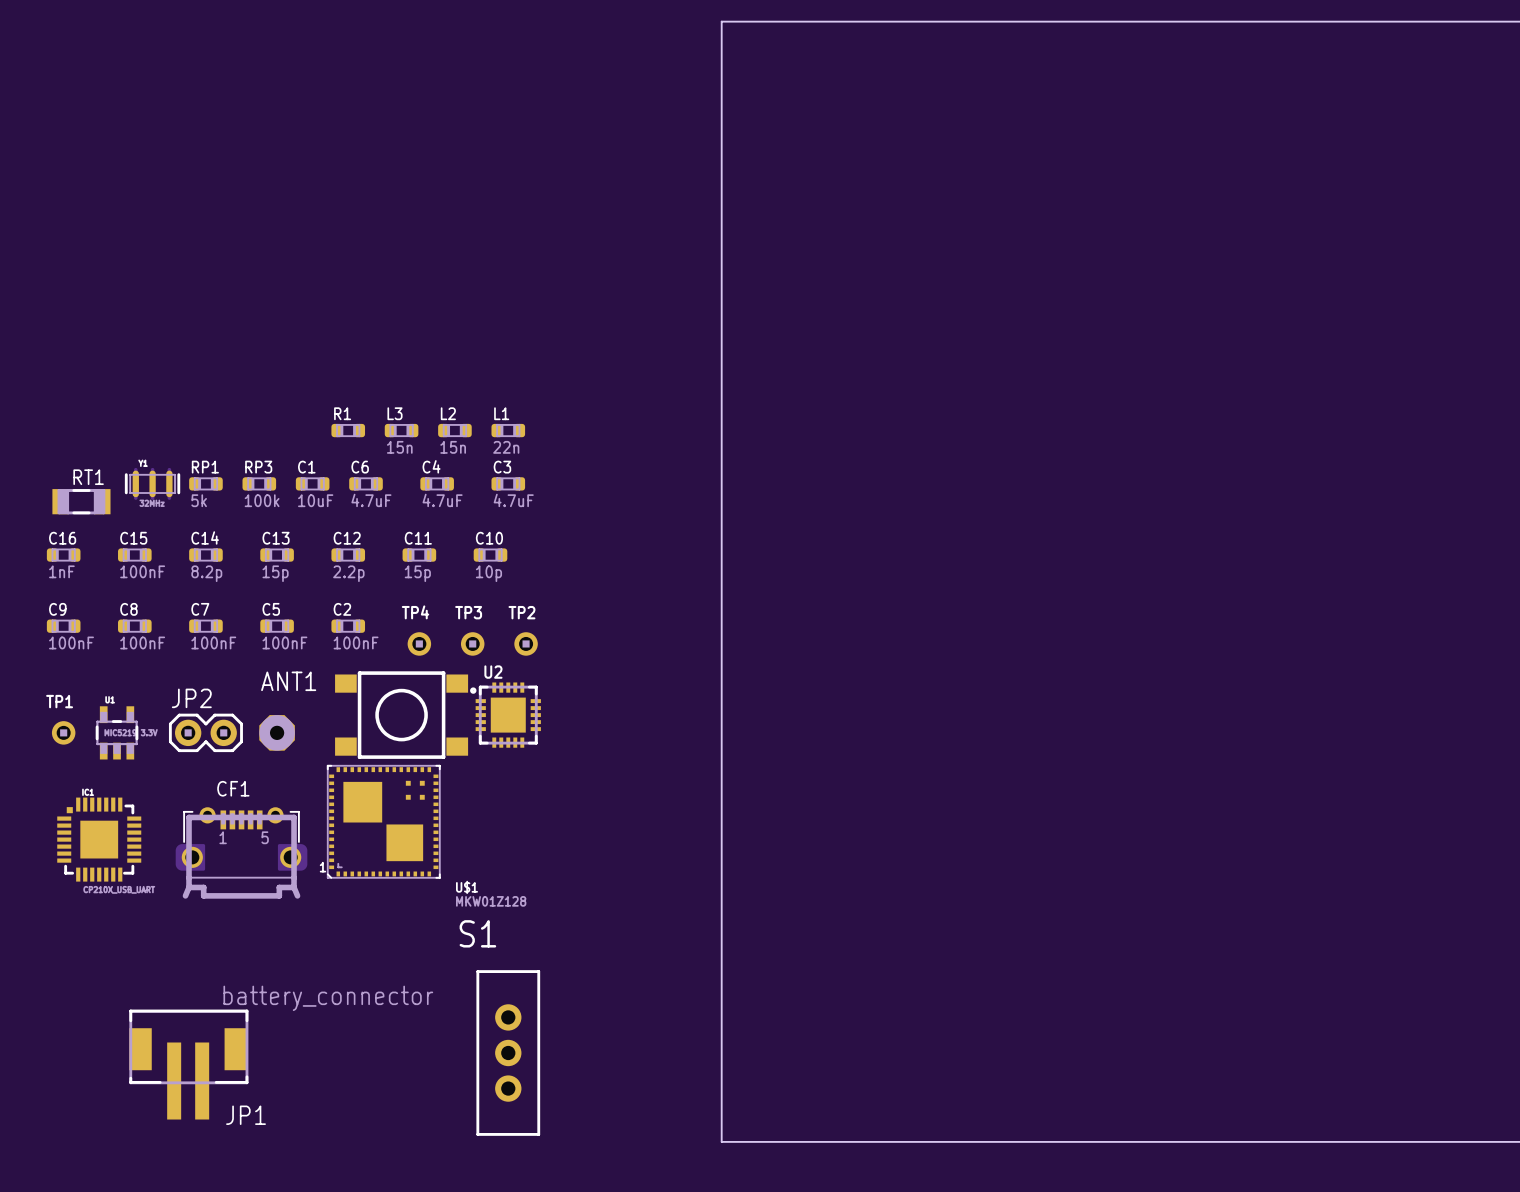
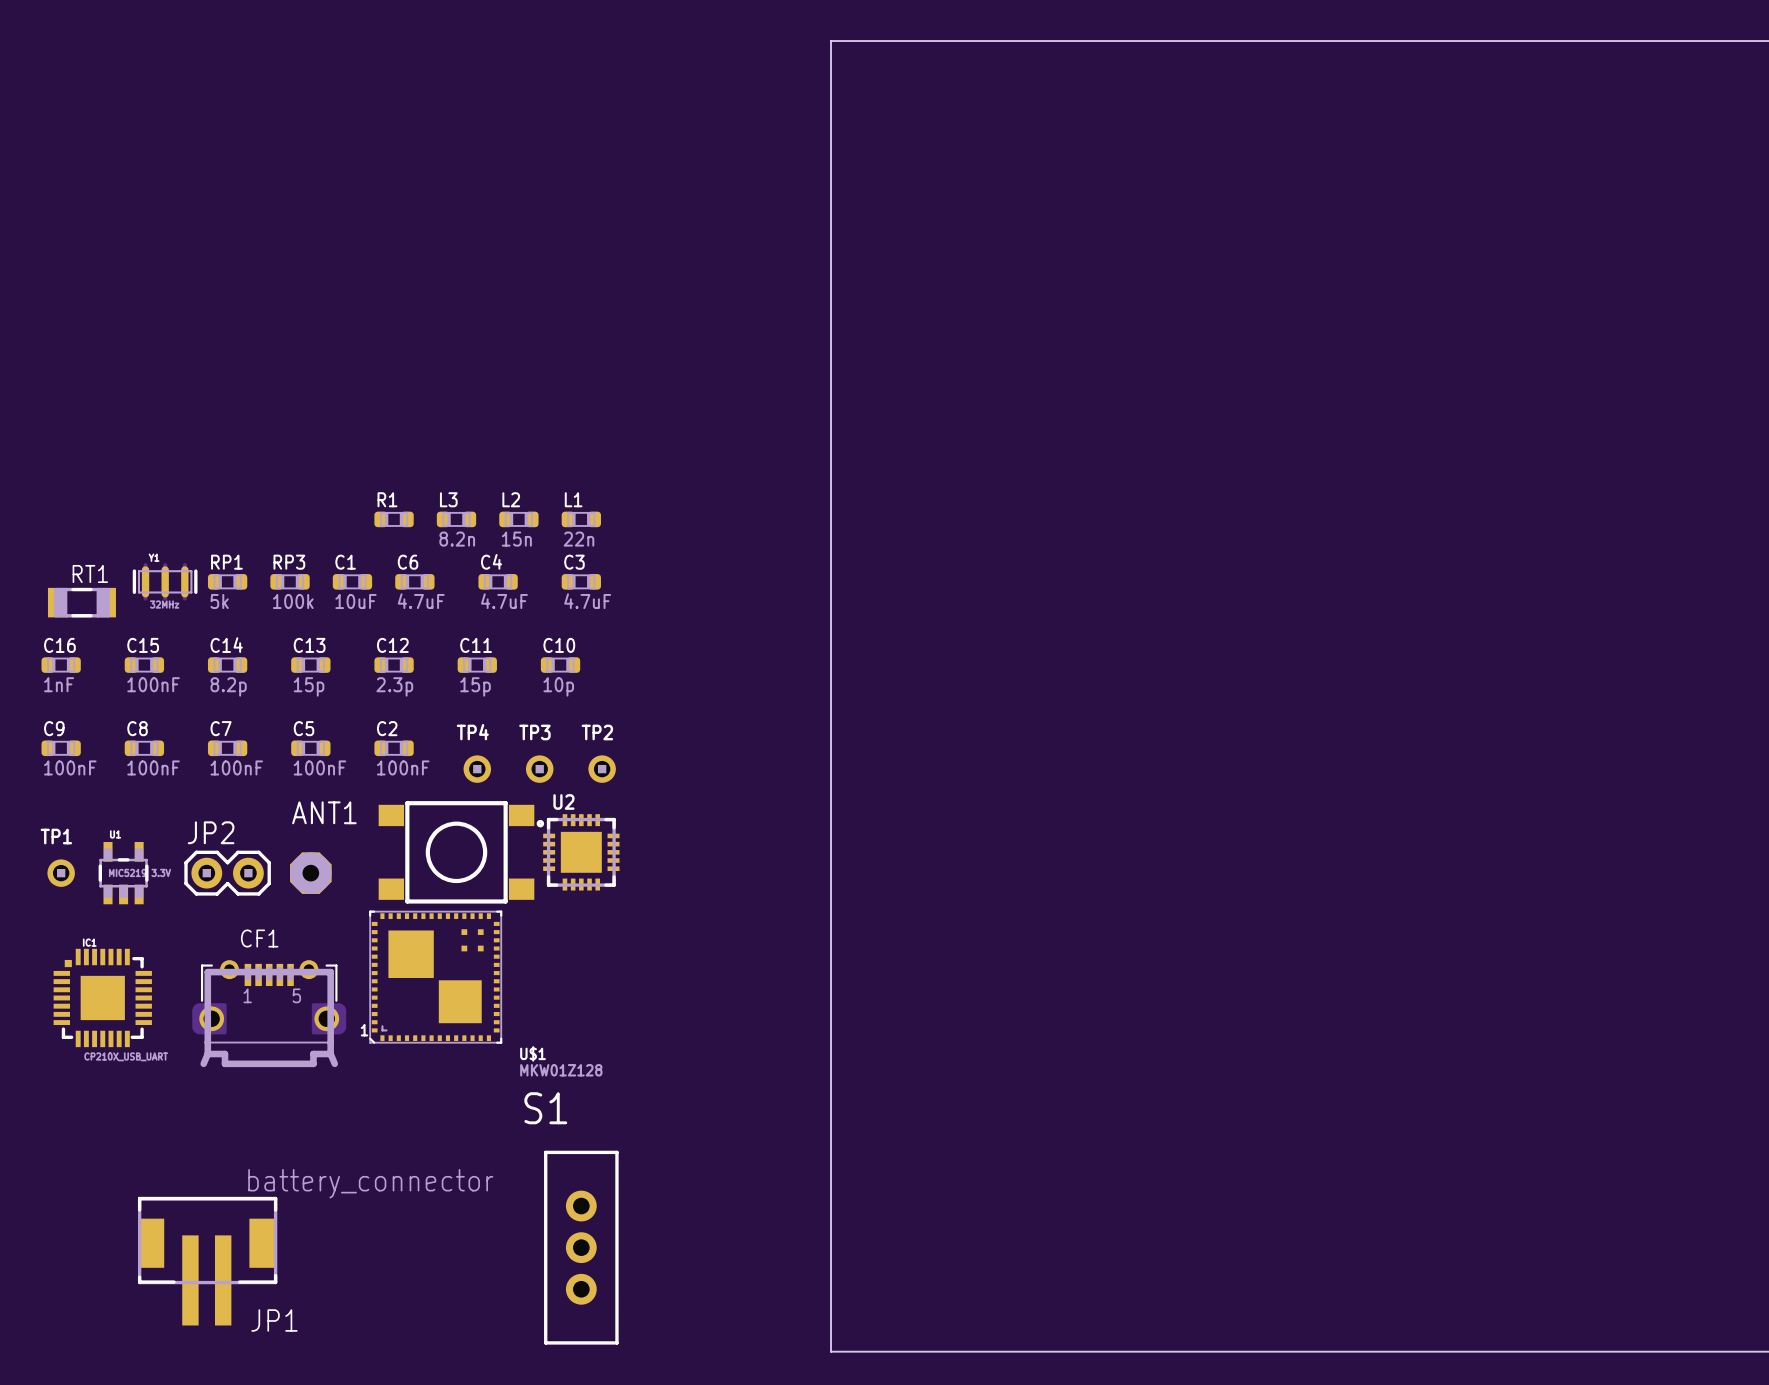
L3 value: 15n (399, 447) -> 8.2n (457, 539)
C12 value: 2.2p (348, 573) -> 2.3p (394, 686)

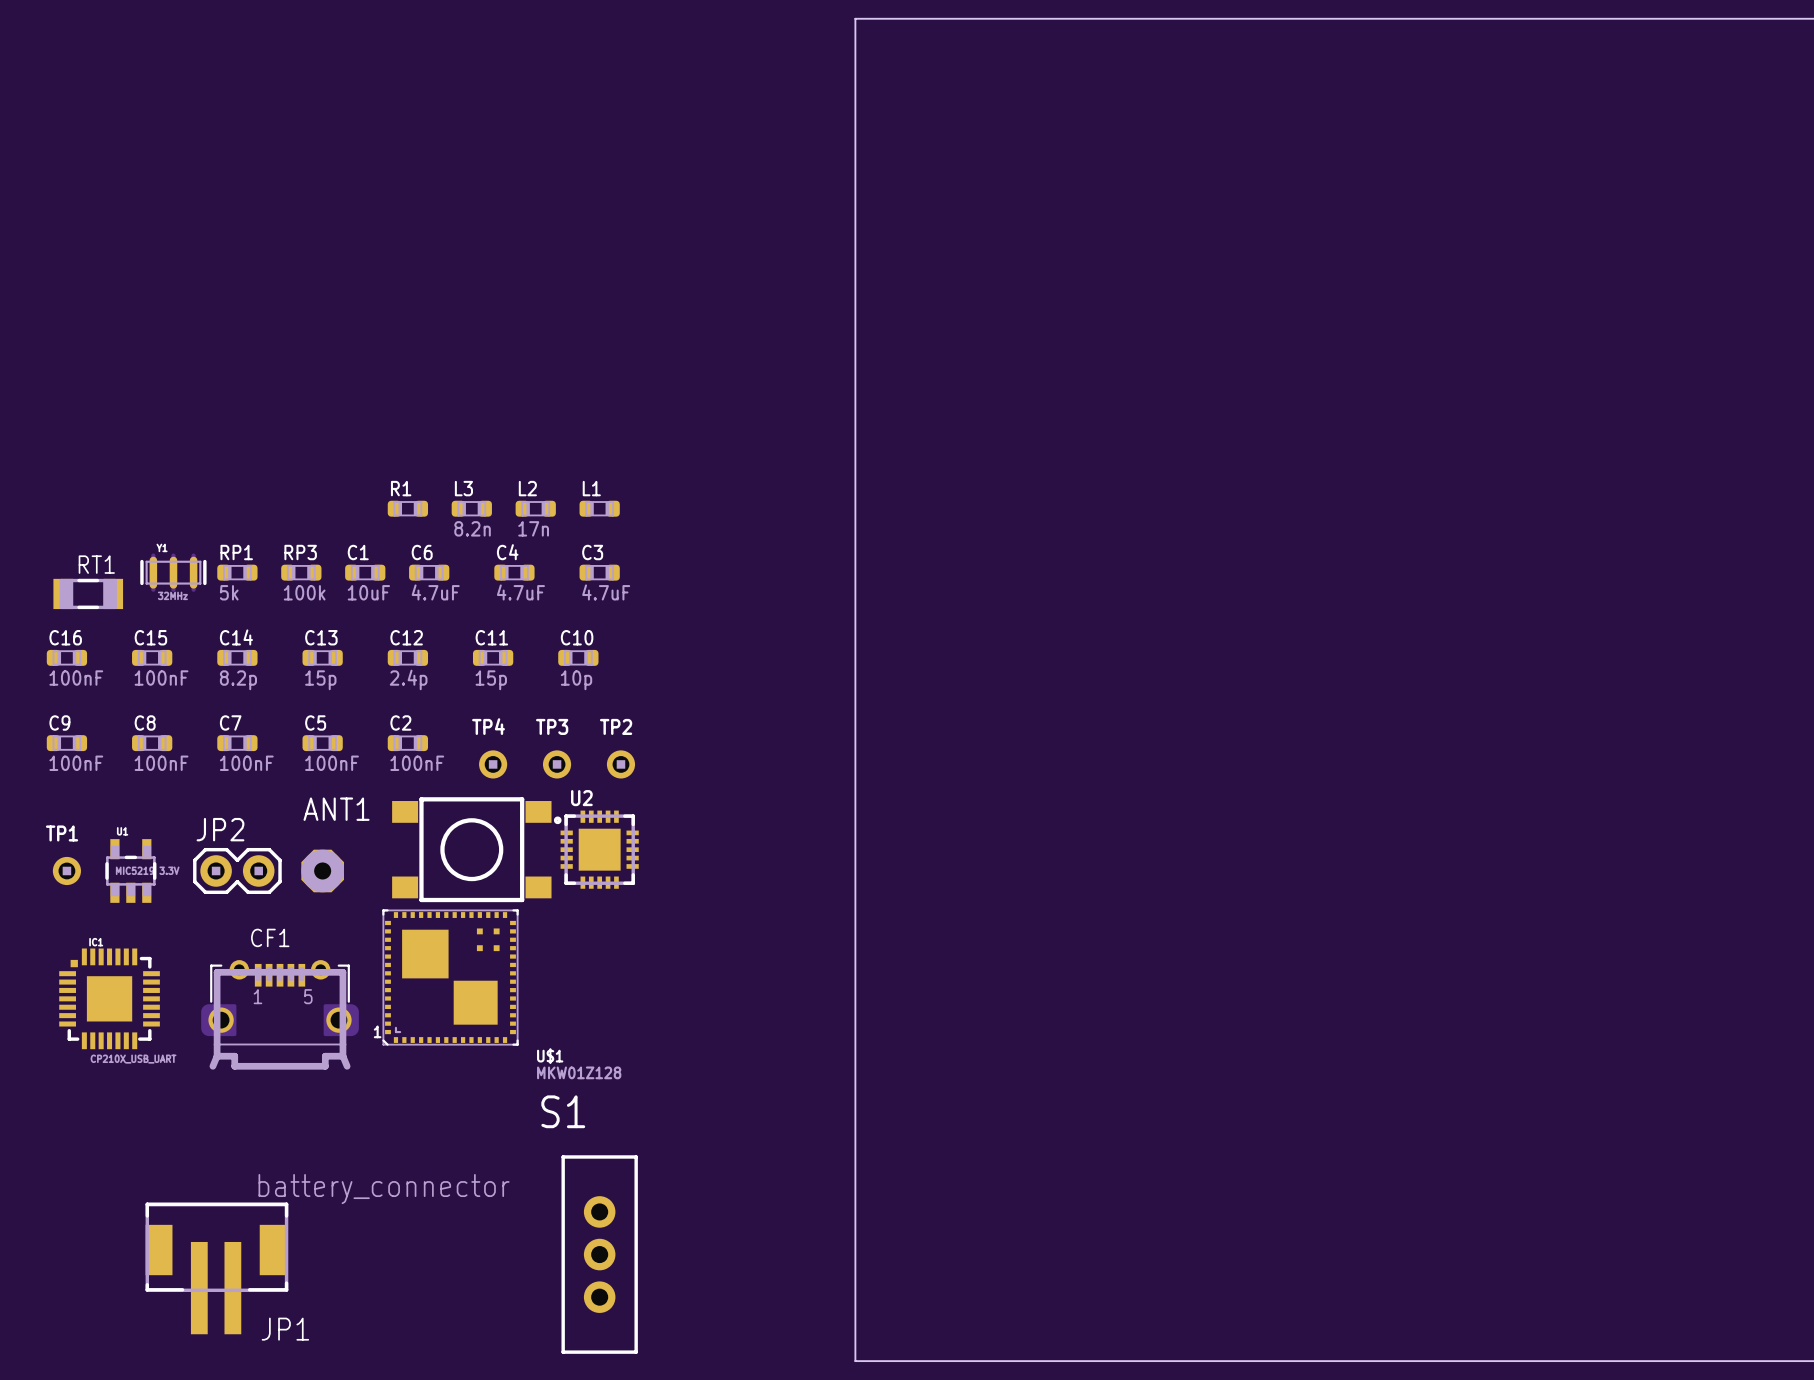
L2 value: 15n (516, 539) -> 17n (533, 528)
L1 value: 22n (578, 539) -> none
C16 value: 1nF (59, 684) -> 100nF (76, 678)
C12 value: 2.3p (394, 686) -> 2.4p (408, 679)

